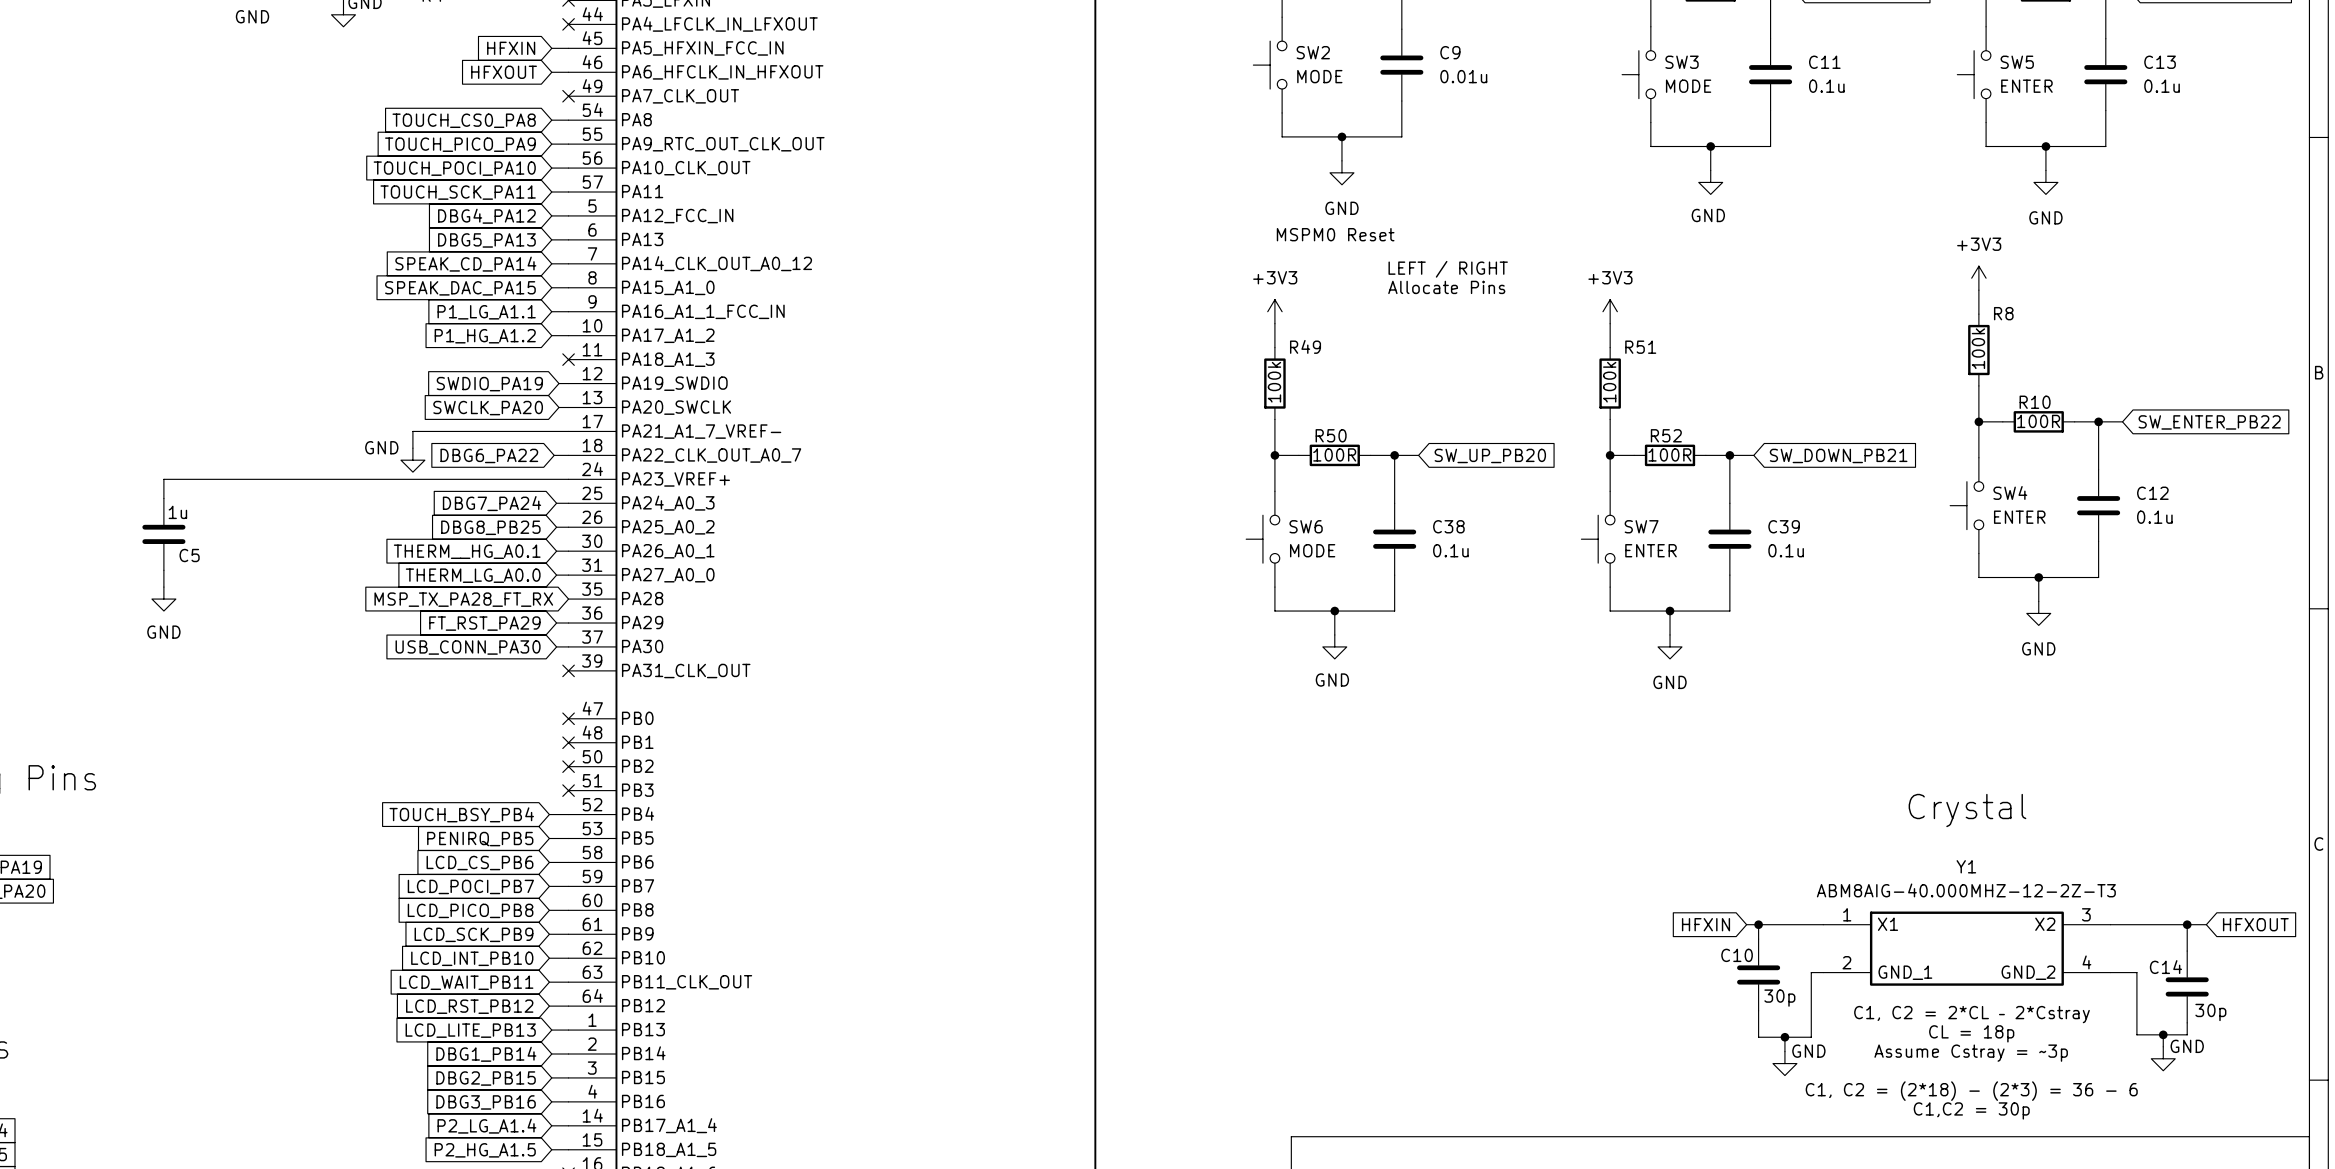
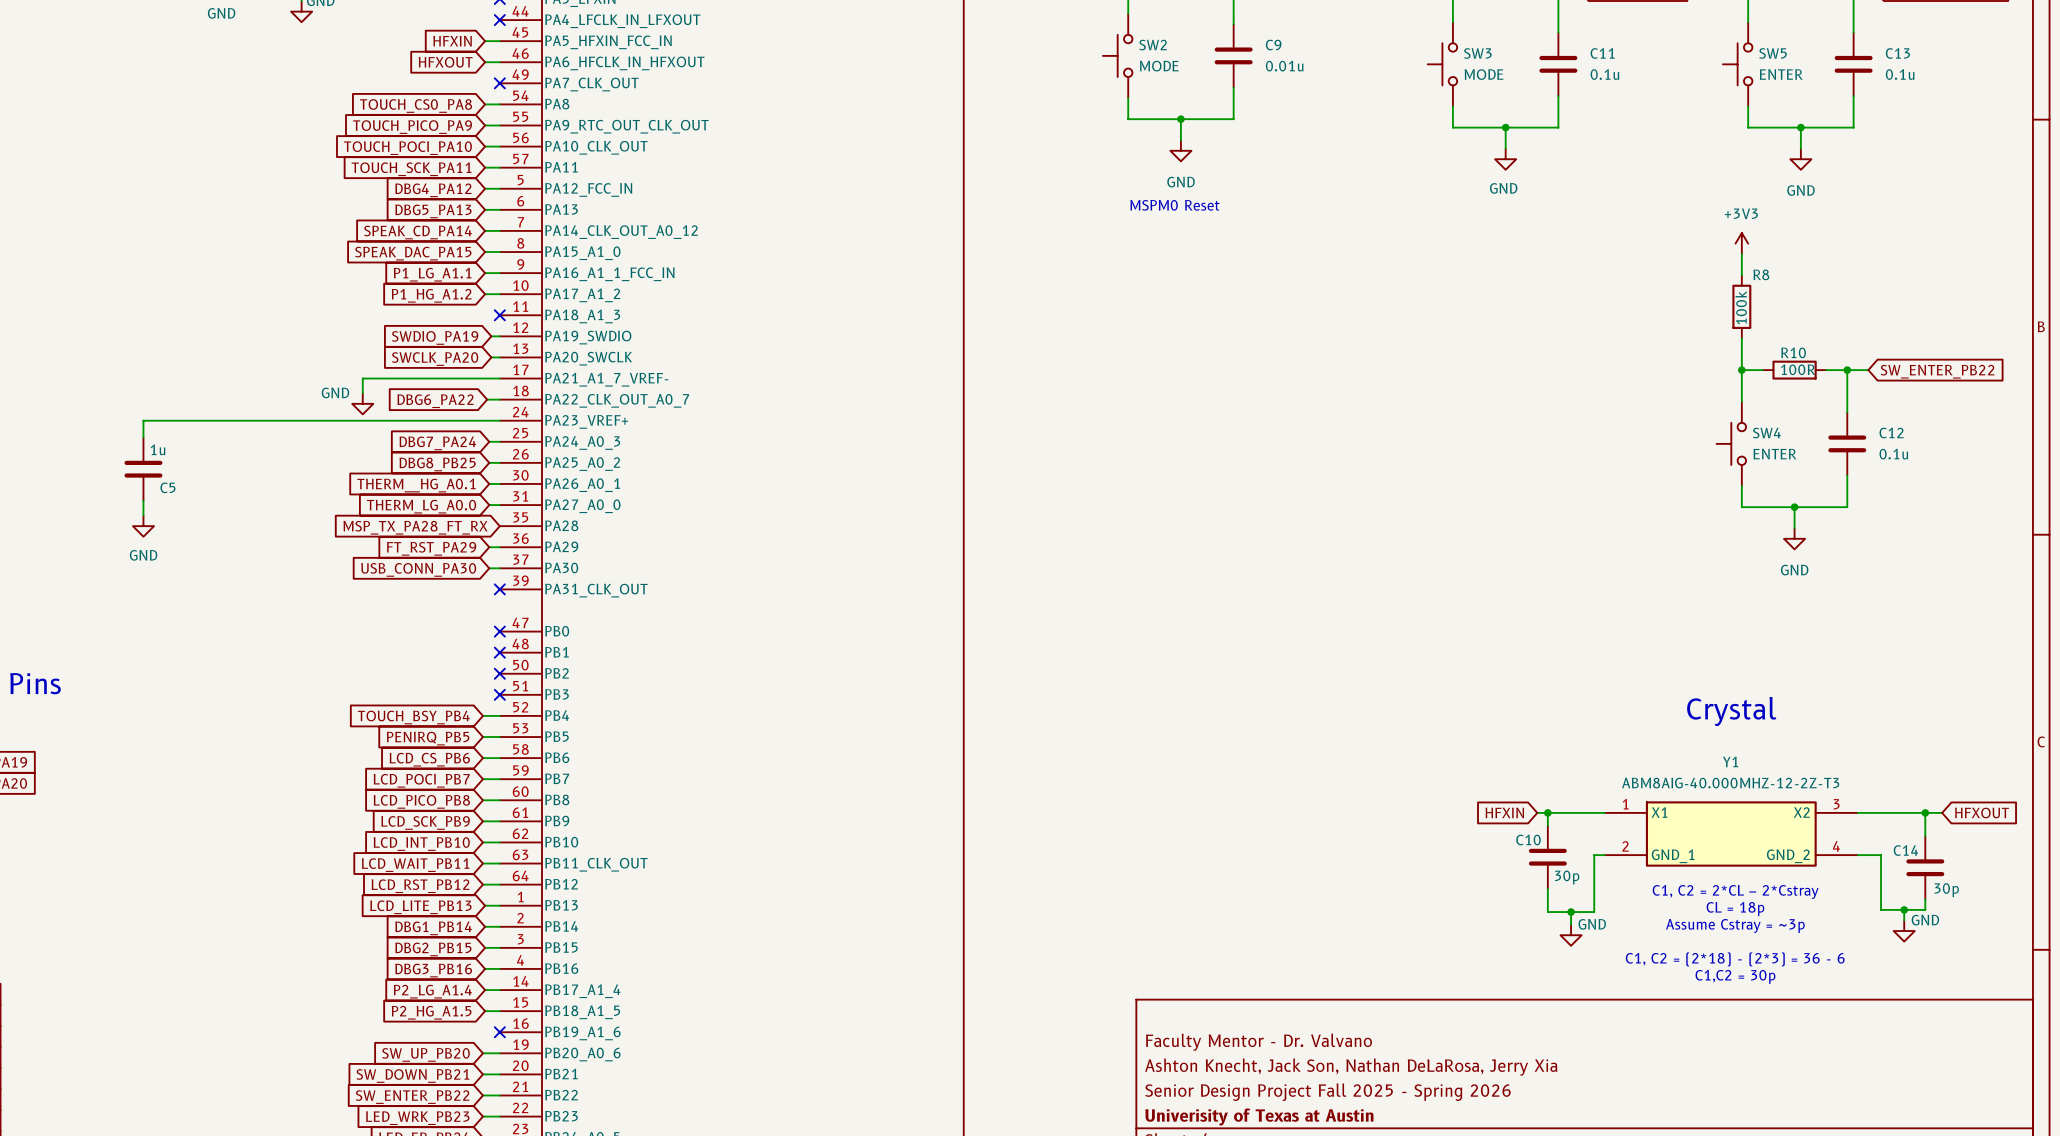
text: LEFT / RIGHT (1448, 269) -> none
text: Allocate Pins (1446, 287) -> none
power symbol: +3V3 (1274, 311) -> none
power symbol: +3V3 (1610, 311) -> none
wire: (1274, 323) (1274, 347) -> none
wire: (1610, 323) (1610, 347) -> none
R49: 100k (1274, 383) -> none
R51: 100k (1610, 383) -> none
wire: (1274, 419) (1274, 491) -> none
wire: (1610, 419) (1610, 491) -> none
wire: (1274, 455) (1298, 455) -> none
junction: (1274, 455) -> none
R50: 100R (1334, 455) -> none
wire: (1370, 455) (1418, 455) -> none
wire: (1394, 455) (1394, 503) -> none
junction: (1394, 455) -> none
global label: SW_UP_PB20 (1490, 455) -> none
wire: (1610, 455) (1634, 455) -> none
junction: (1610, 455) -> none
R52: 100R (1670, 455) -> none
wire: (1705, 455) (1753, 455) -> none
wire: (1729, 455) (1729, 503) -> none
junction: (1729, 455) -> none
global label: SW_DOWN_PB21 (1838, 455) -> none
SW6: MODE (1262, 539) -> none
C38: 0.1u (1394, 539) -> none
SW7: ENTER (1598, 539) -> none
C39: 0.1u (1729, 539) -> none
wire: (1394, 575) (1394, 611) (1274, 611) (1274, 587) -> none
wire: (1729, 575) (1729, 611) (1610, 611) (1610, 587) -> none
wire: (1334, 611) (1334, 634) -> none
junction: (1334, 611) -> none
wire: (1670, 611) (1670, 634) -> none
junction: (1670, 611) -> none
power symbol: GND (1334, 646) -> none
power symbol: GND (1670, 646) -> none

